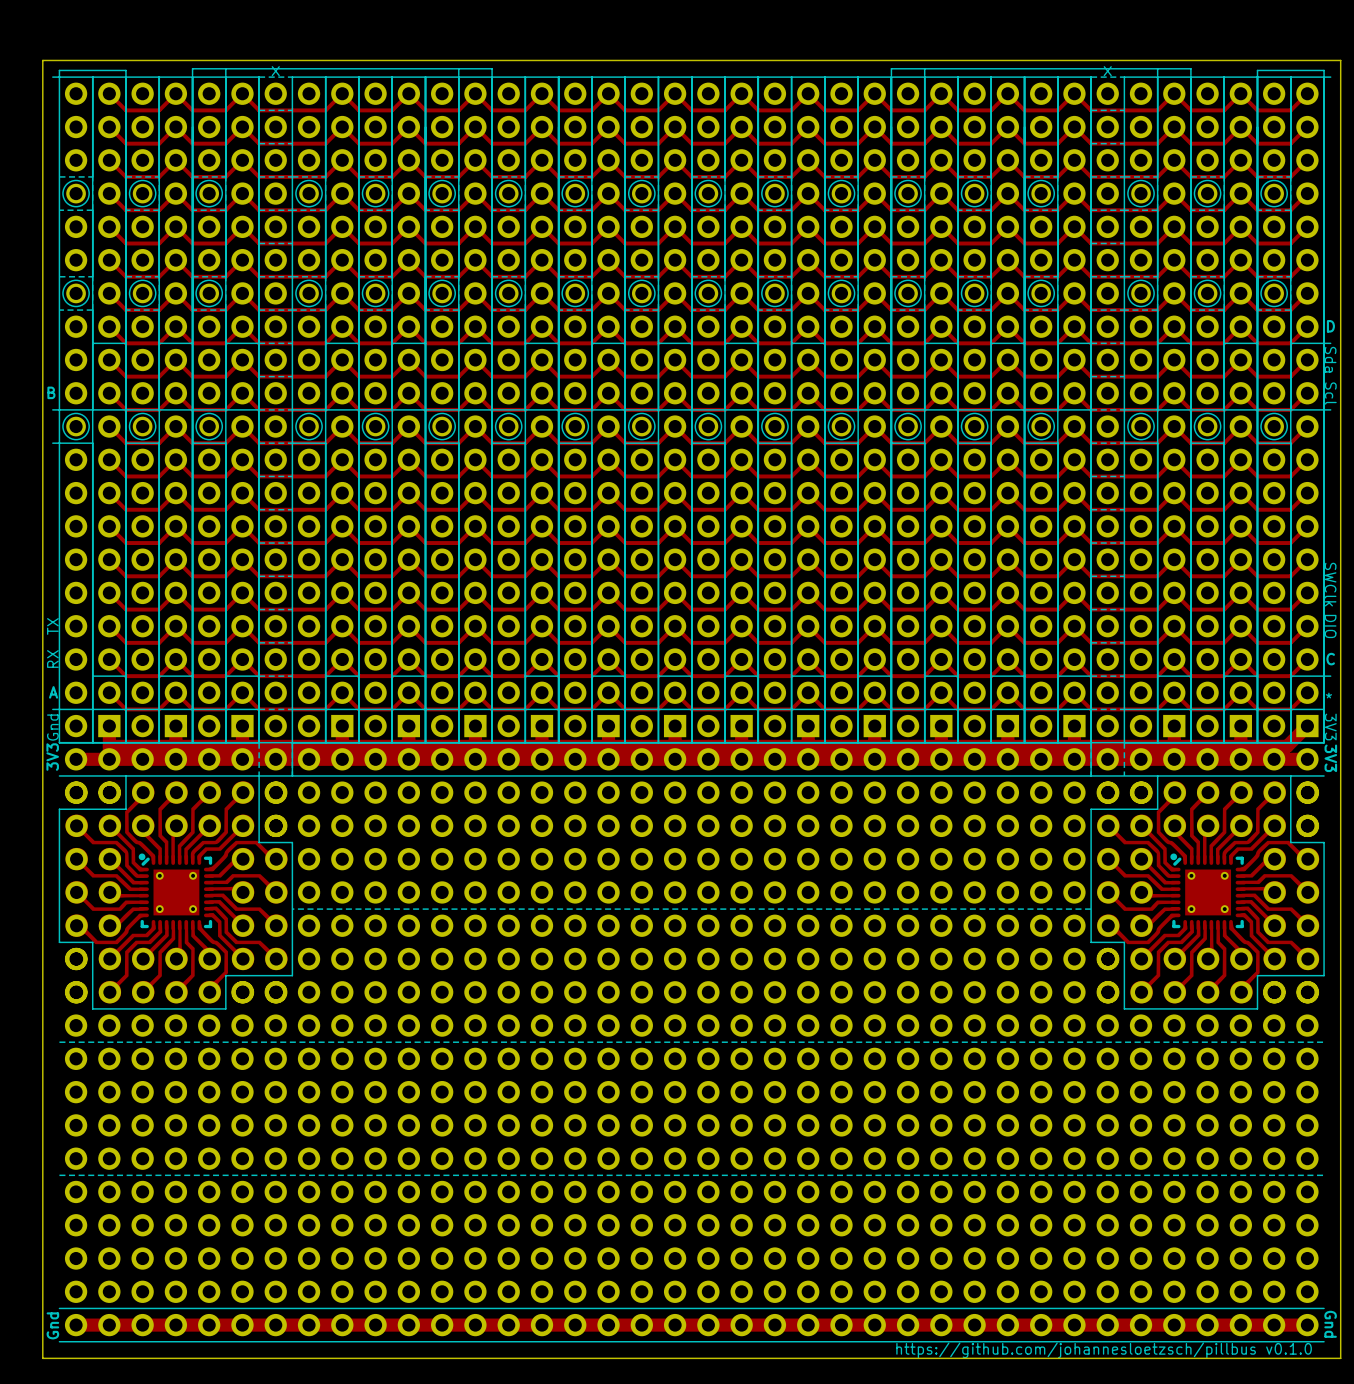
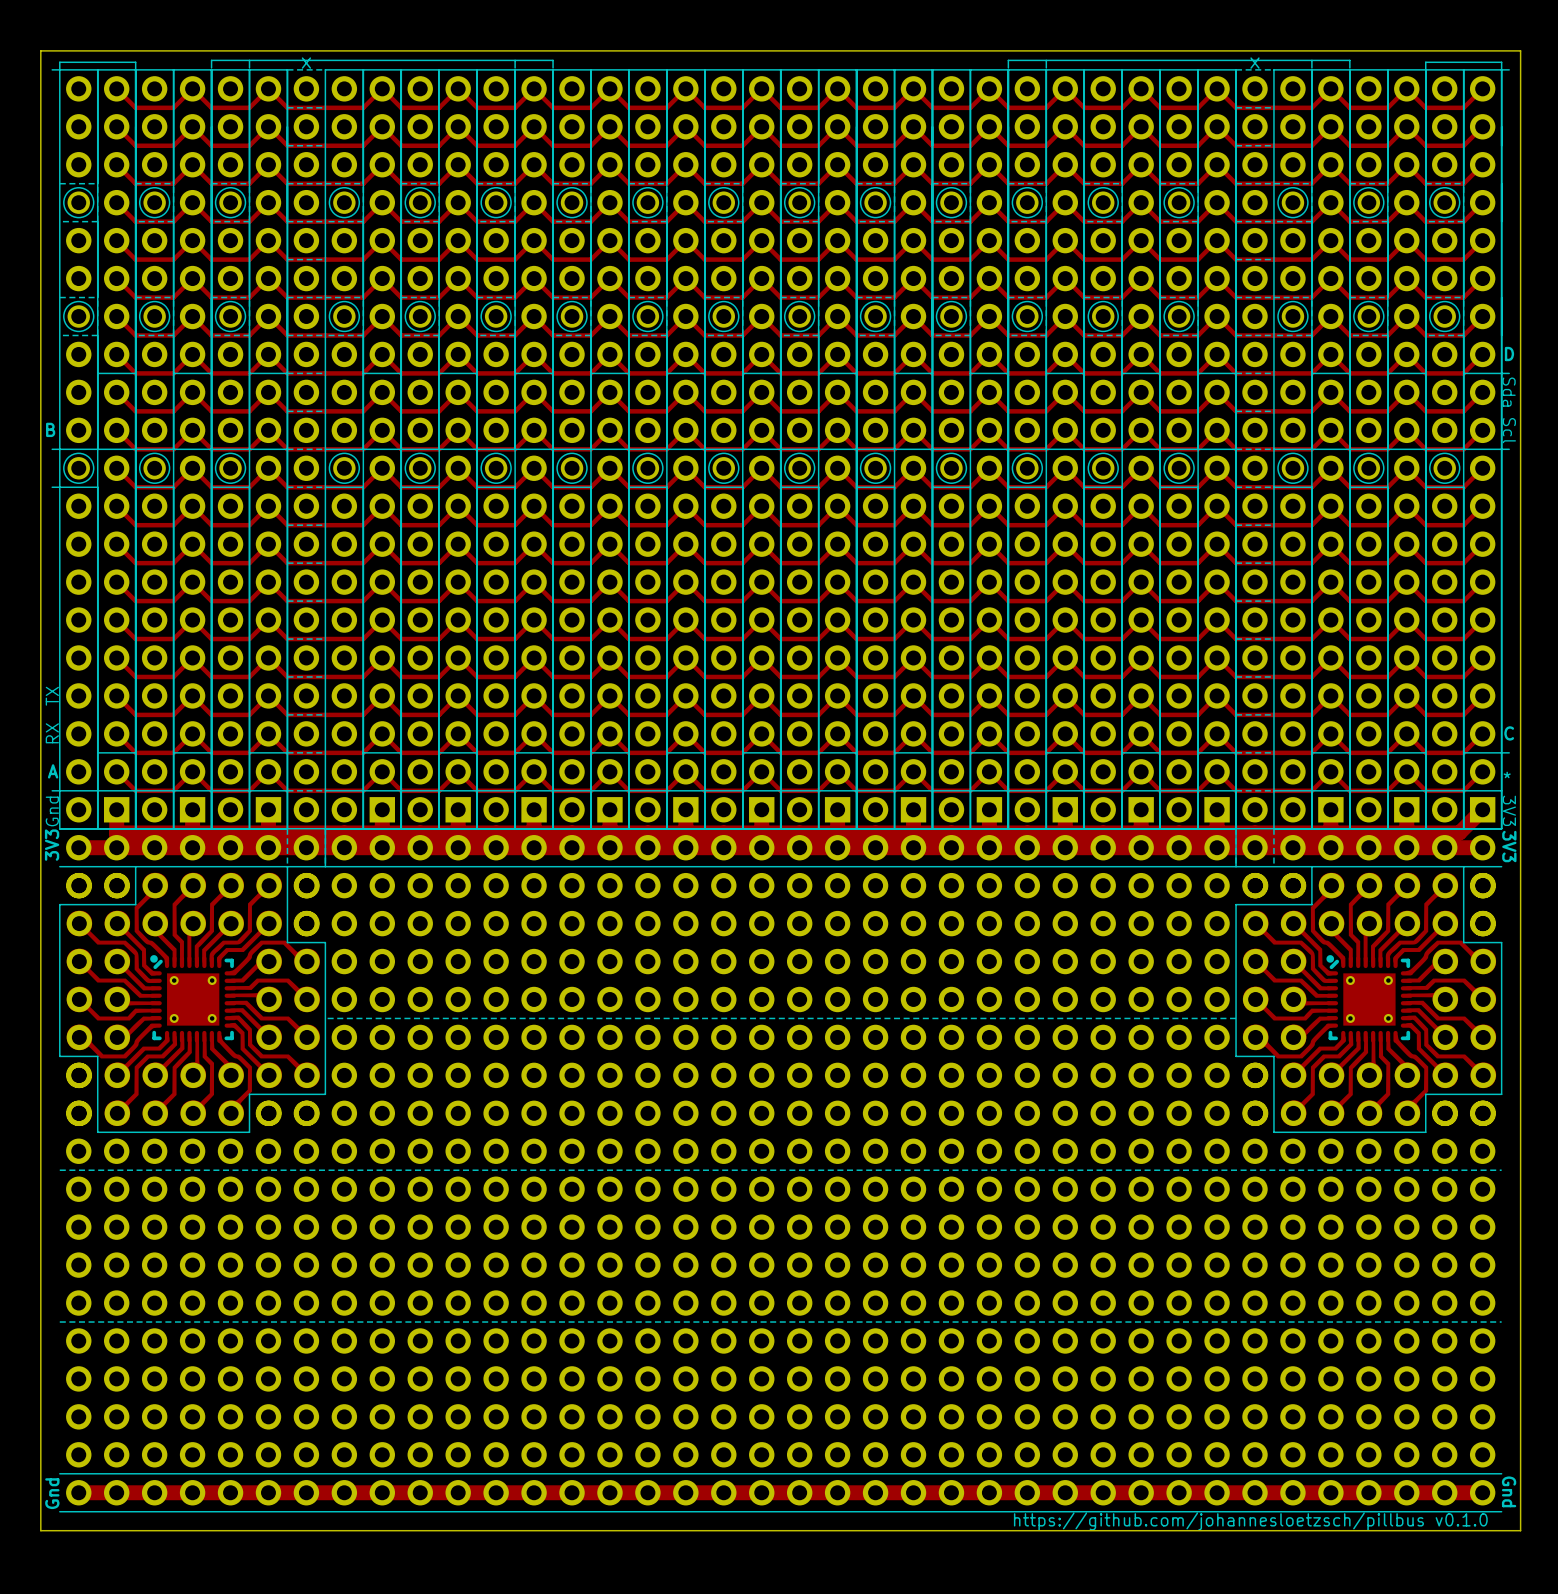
text: SWClk (1330, 584) -> none
text: DIO (1330, 626) -> none

